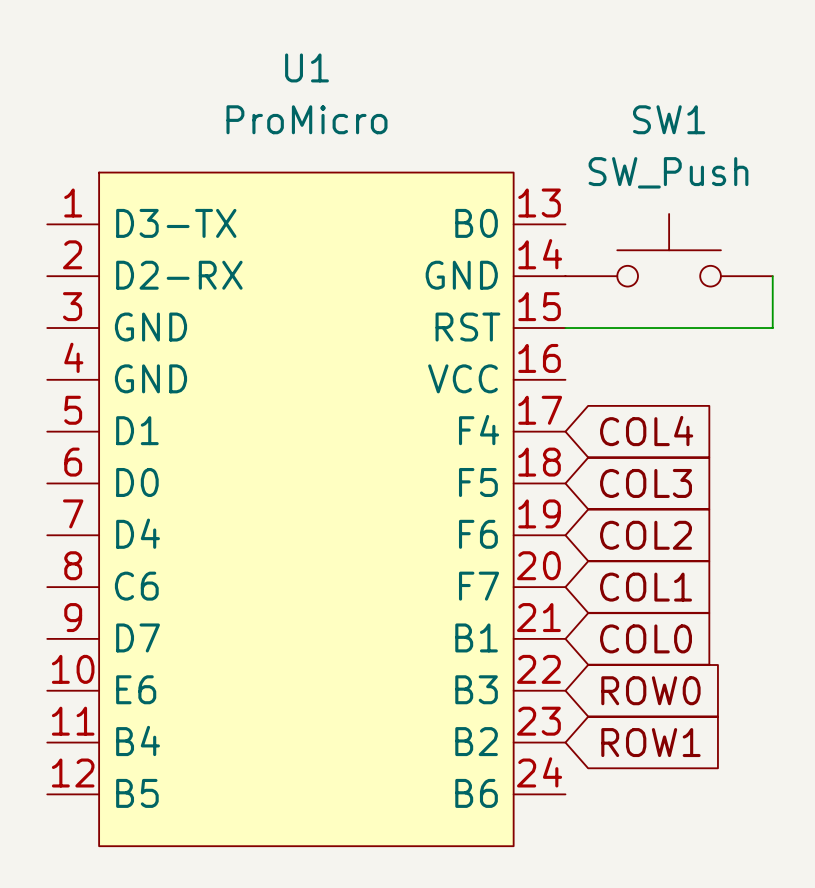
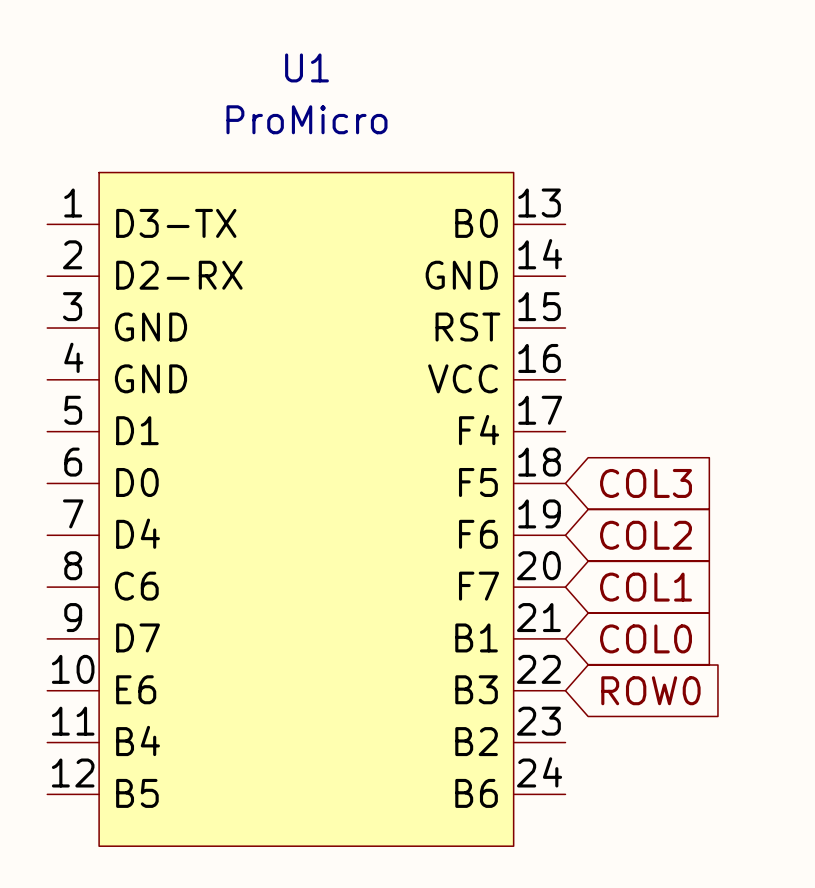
SW1: SW_Push (669, 250) -> none
wire: (772, 276) (772, 328) (565, 328) -> none
global label: COL4 (646, 431) -> none
global label: ROW1 (650, 742) -> none

